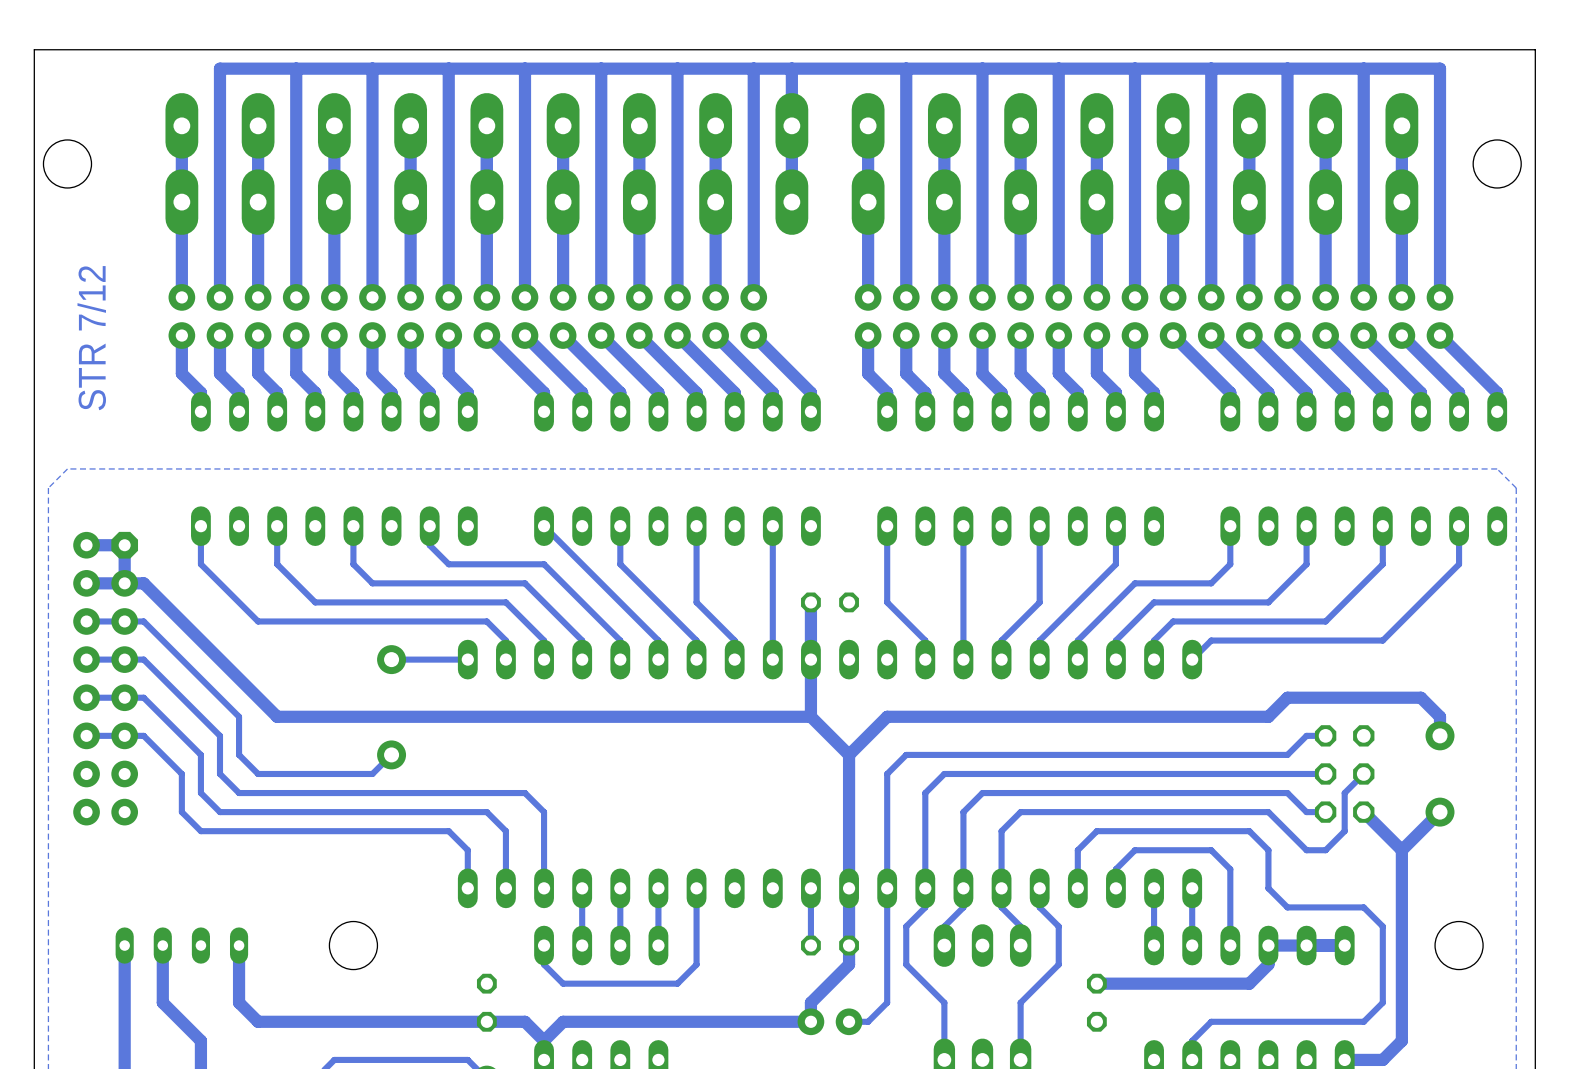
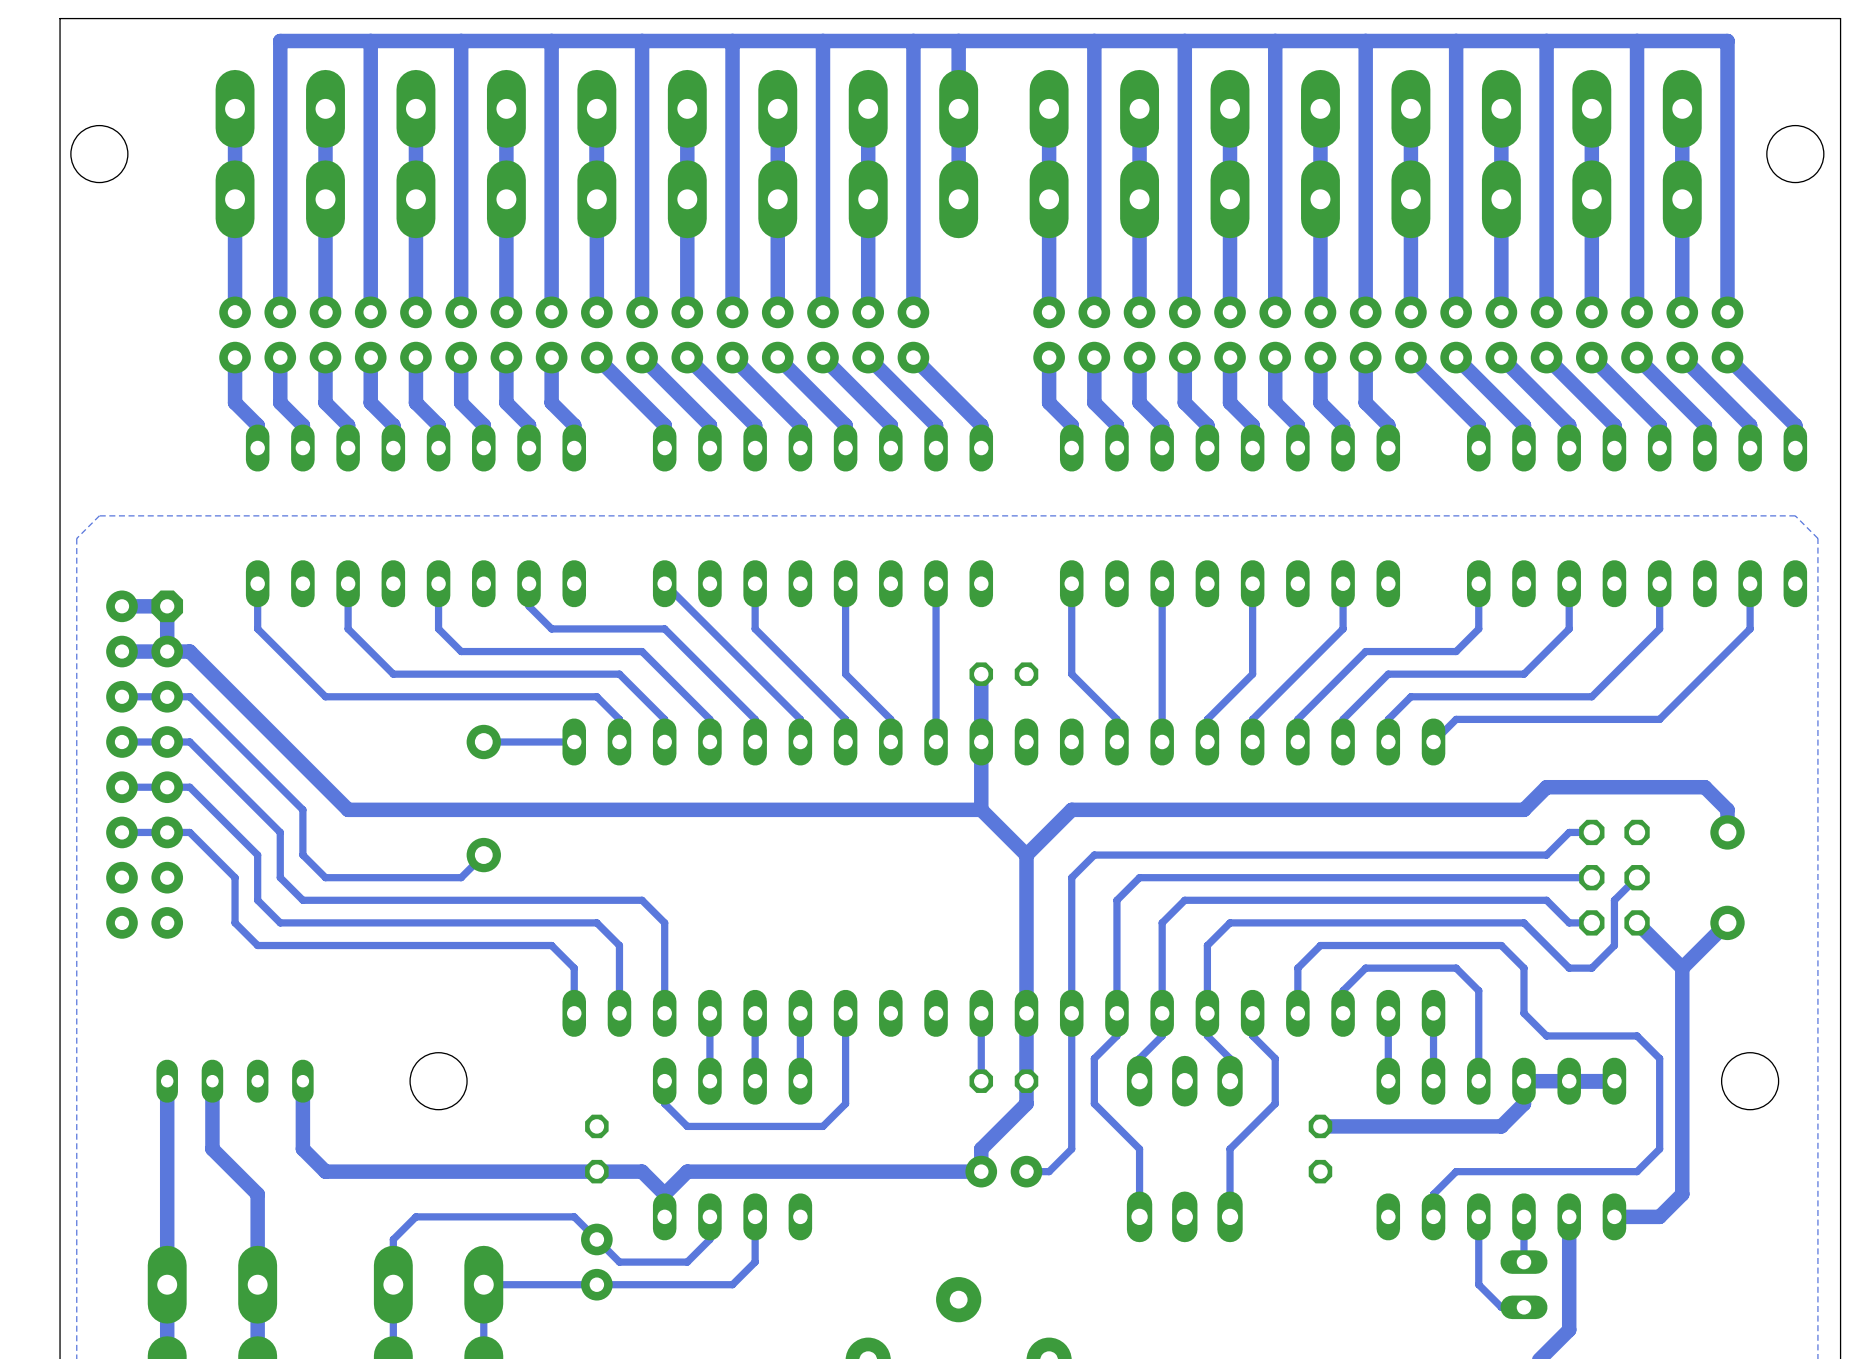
text: STR 7/12 (91, 338) -> none

